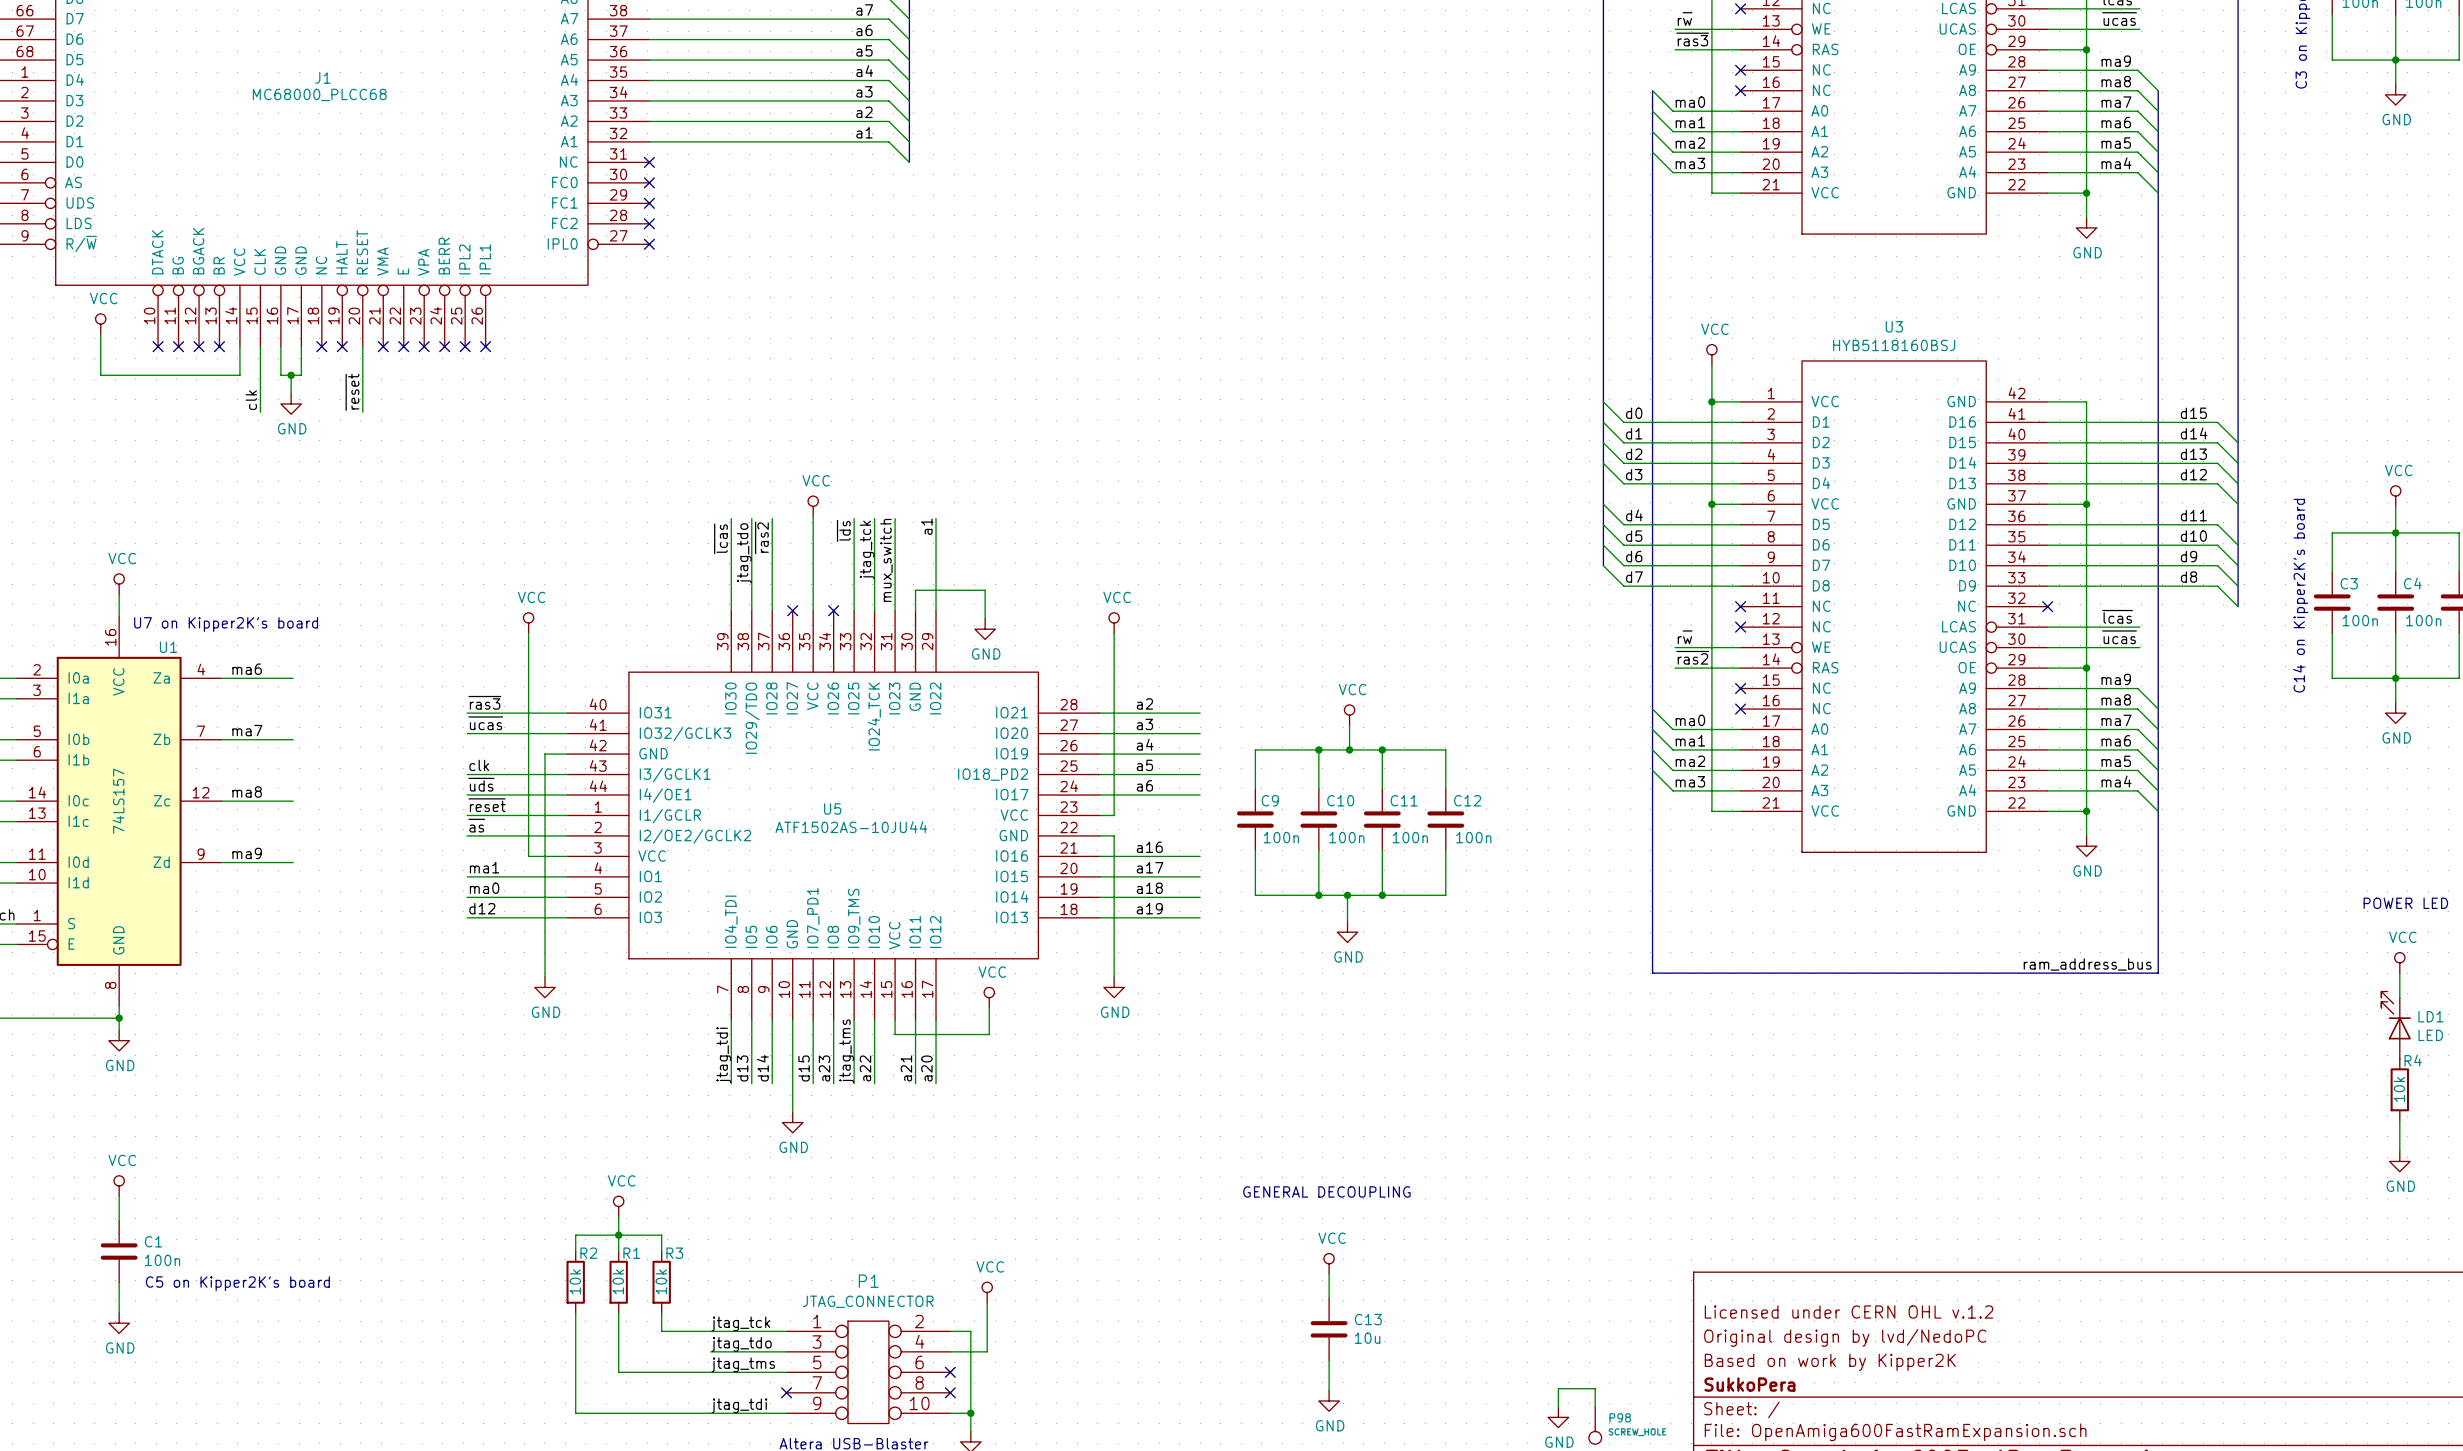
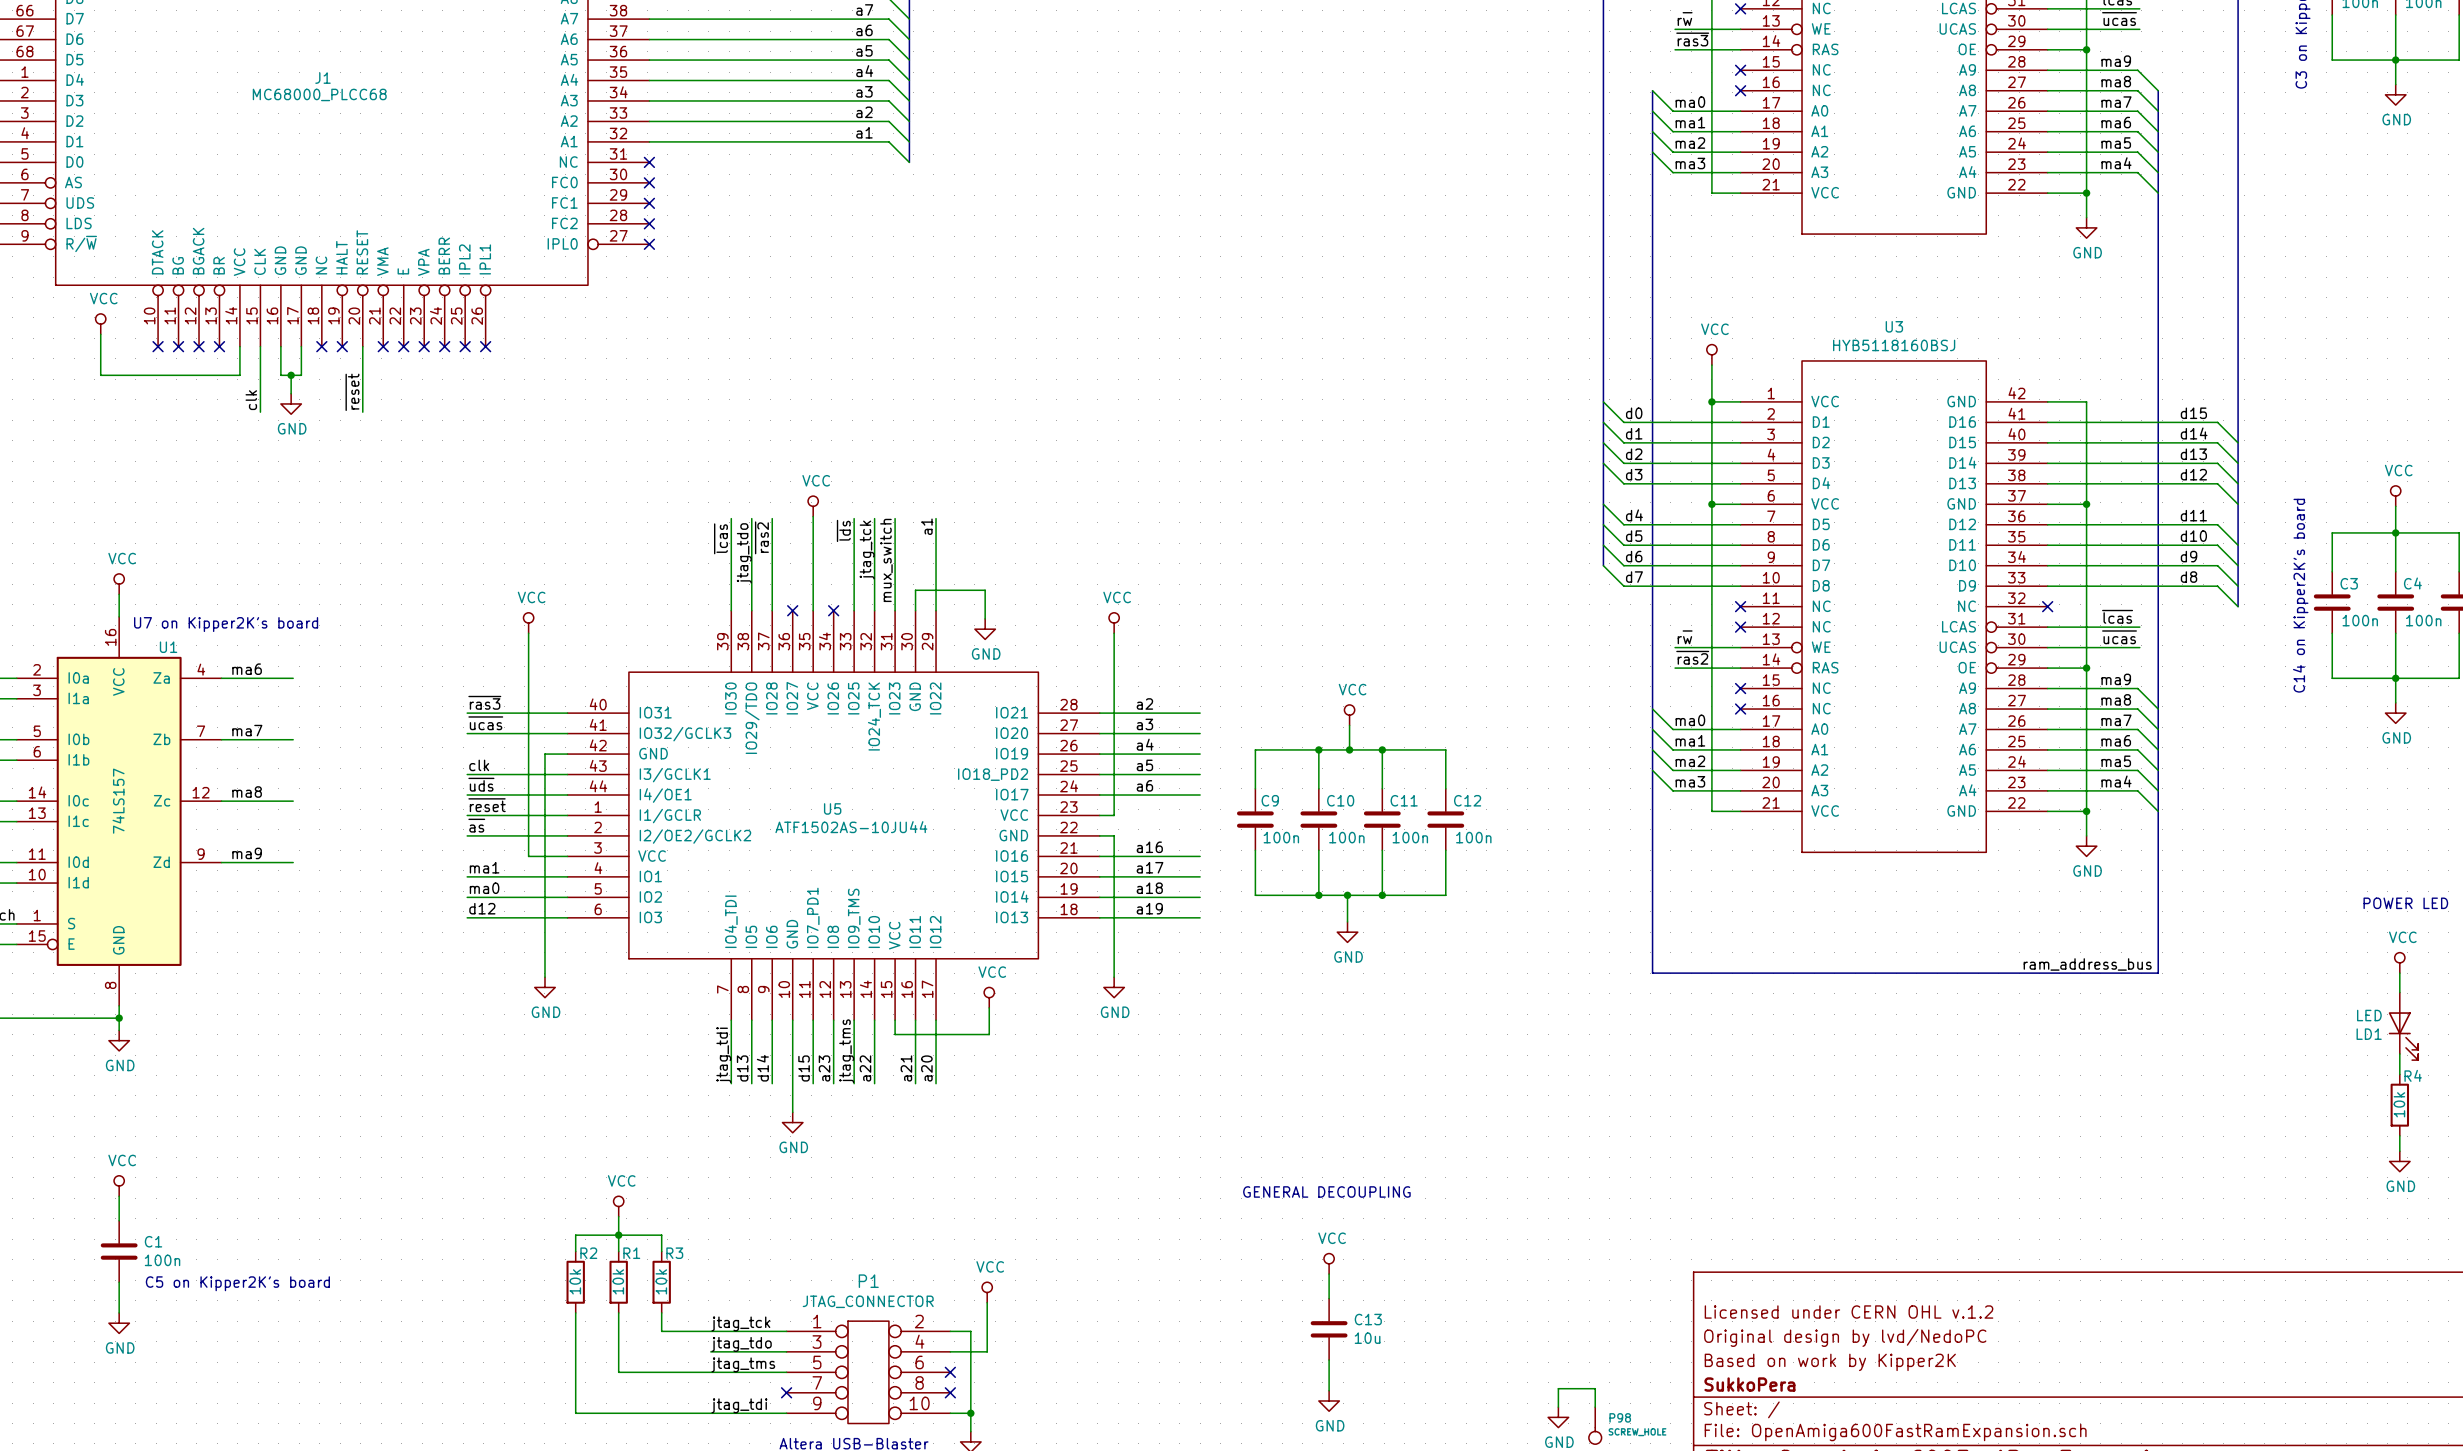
LD1 rotation: 0° (2396, 1015) -> 180° (2403, 1036)
R4 position: (2399, 1089) -> (2399, 1105)

